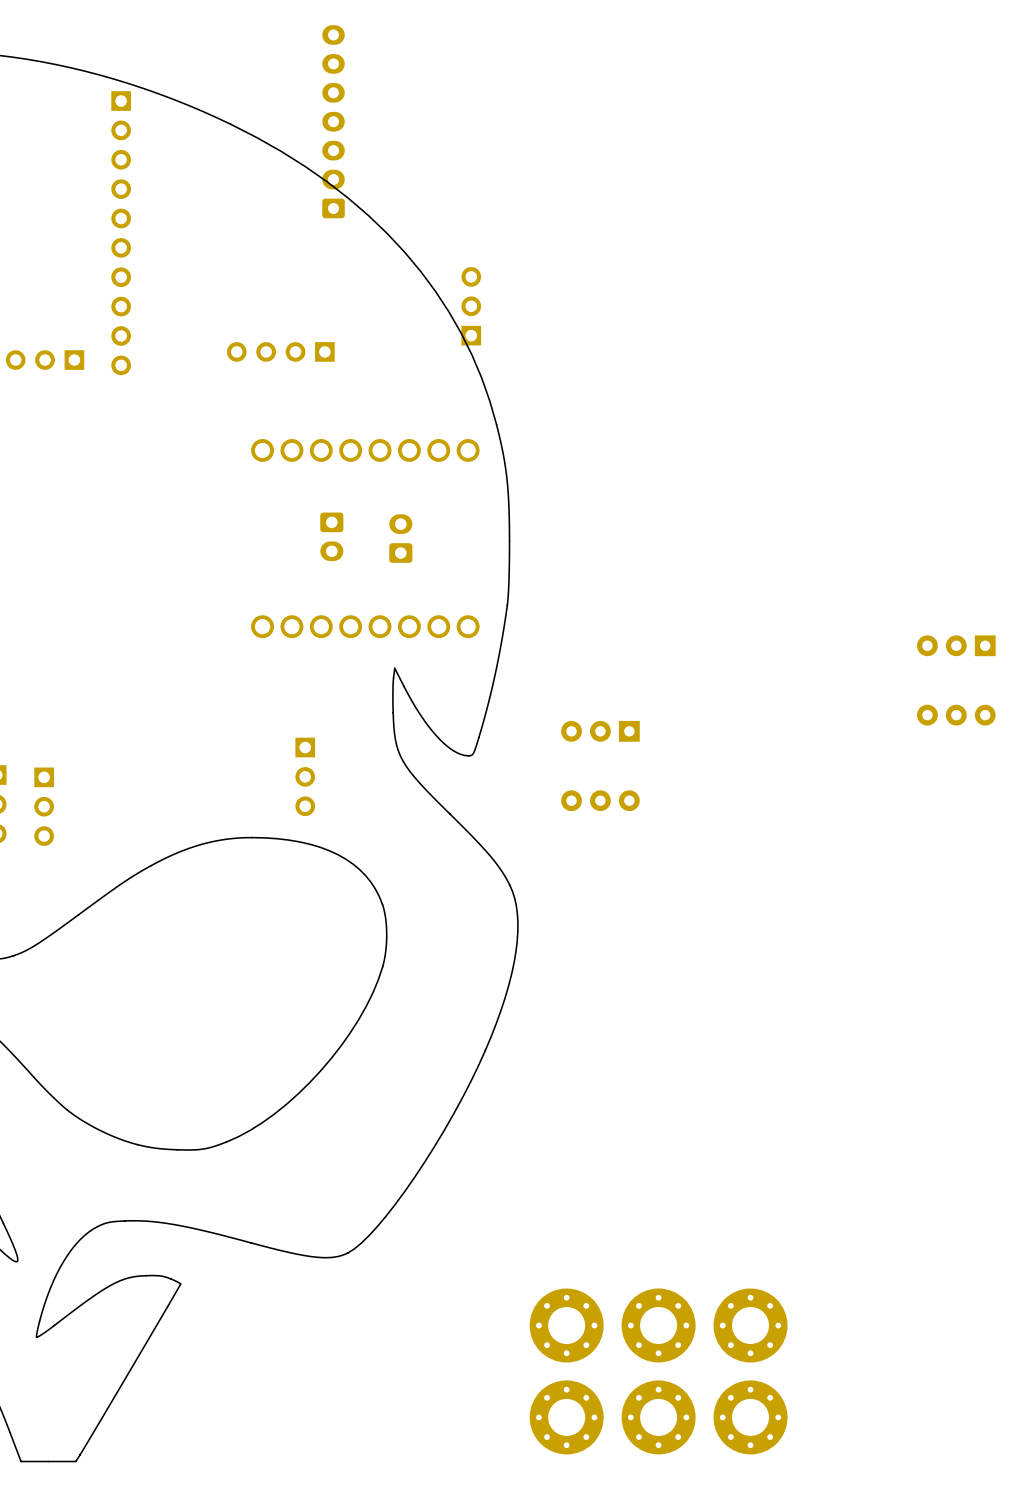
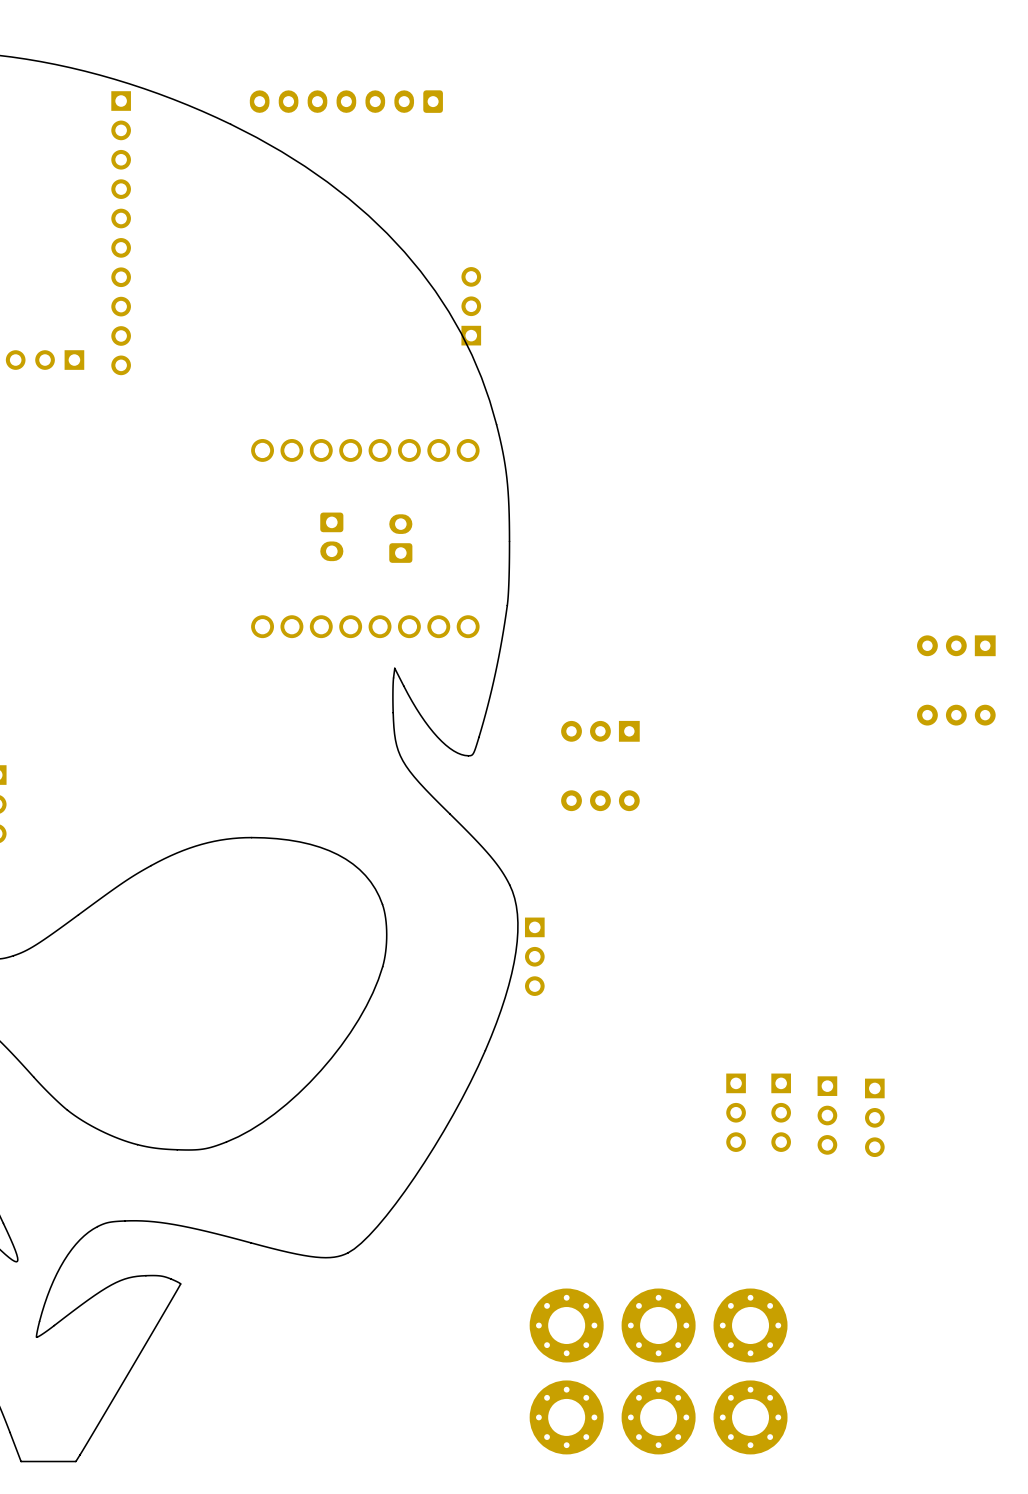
part rotation: 0° (333, 121) -> 90° counterclockwise (346, 101)
part: (280, 351) -> none
part: (305, 776) -> none
part: (44, 806) -> none
part: none -> (534, 956)
part: none -> (736, 1112)
part: none -> (781, 1112)
part: none -> (827, 1115)
part: none -> (874, 1117)

